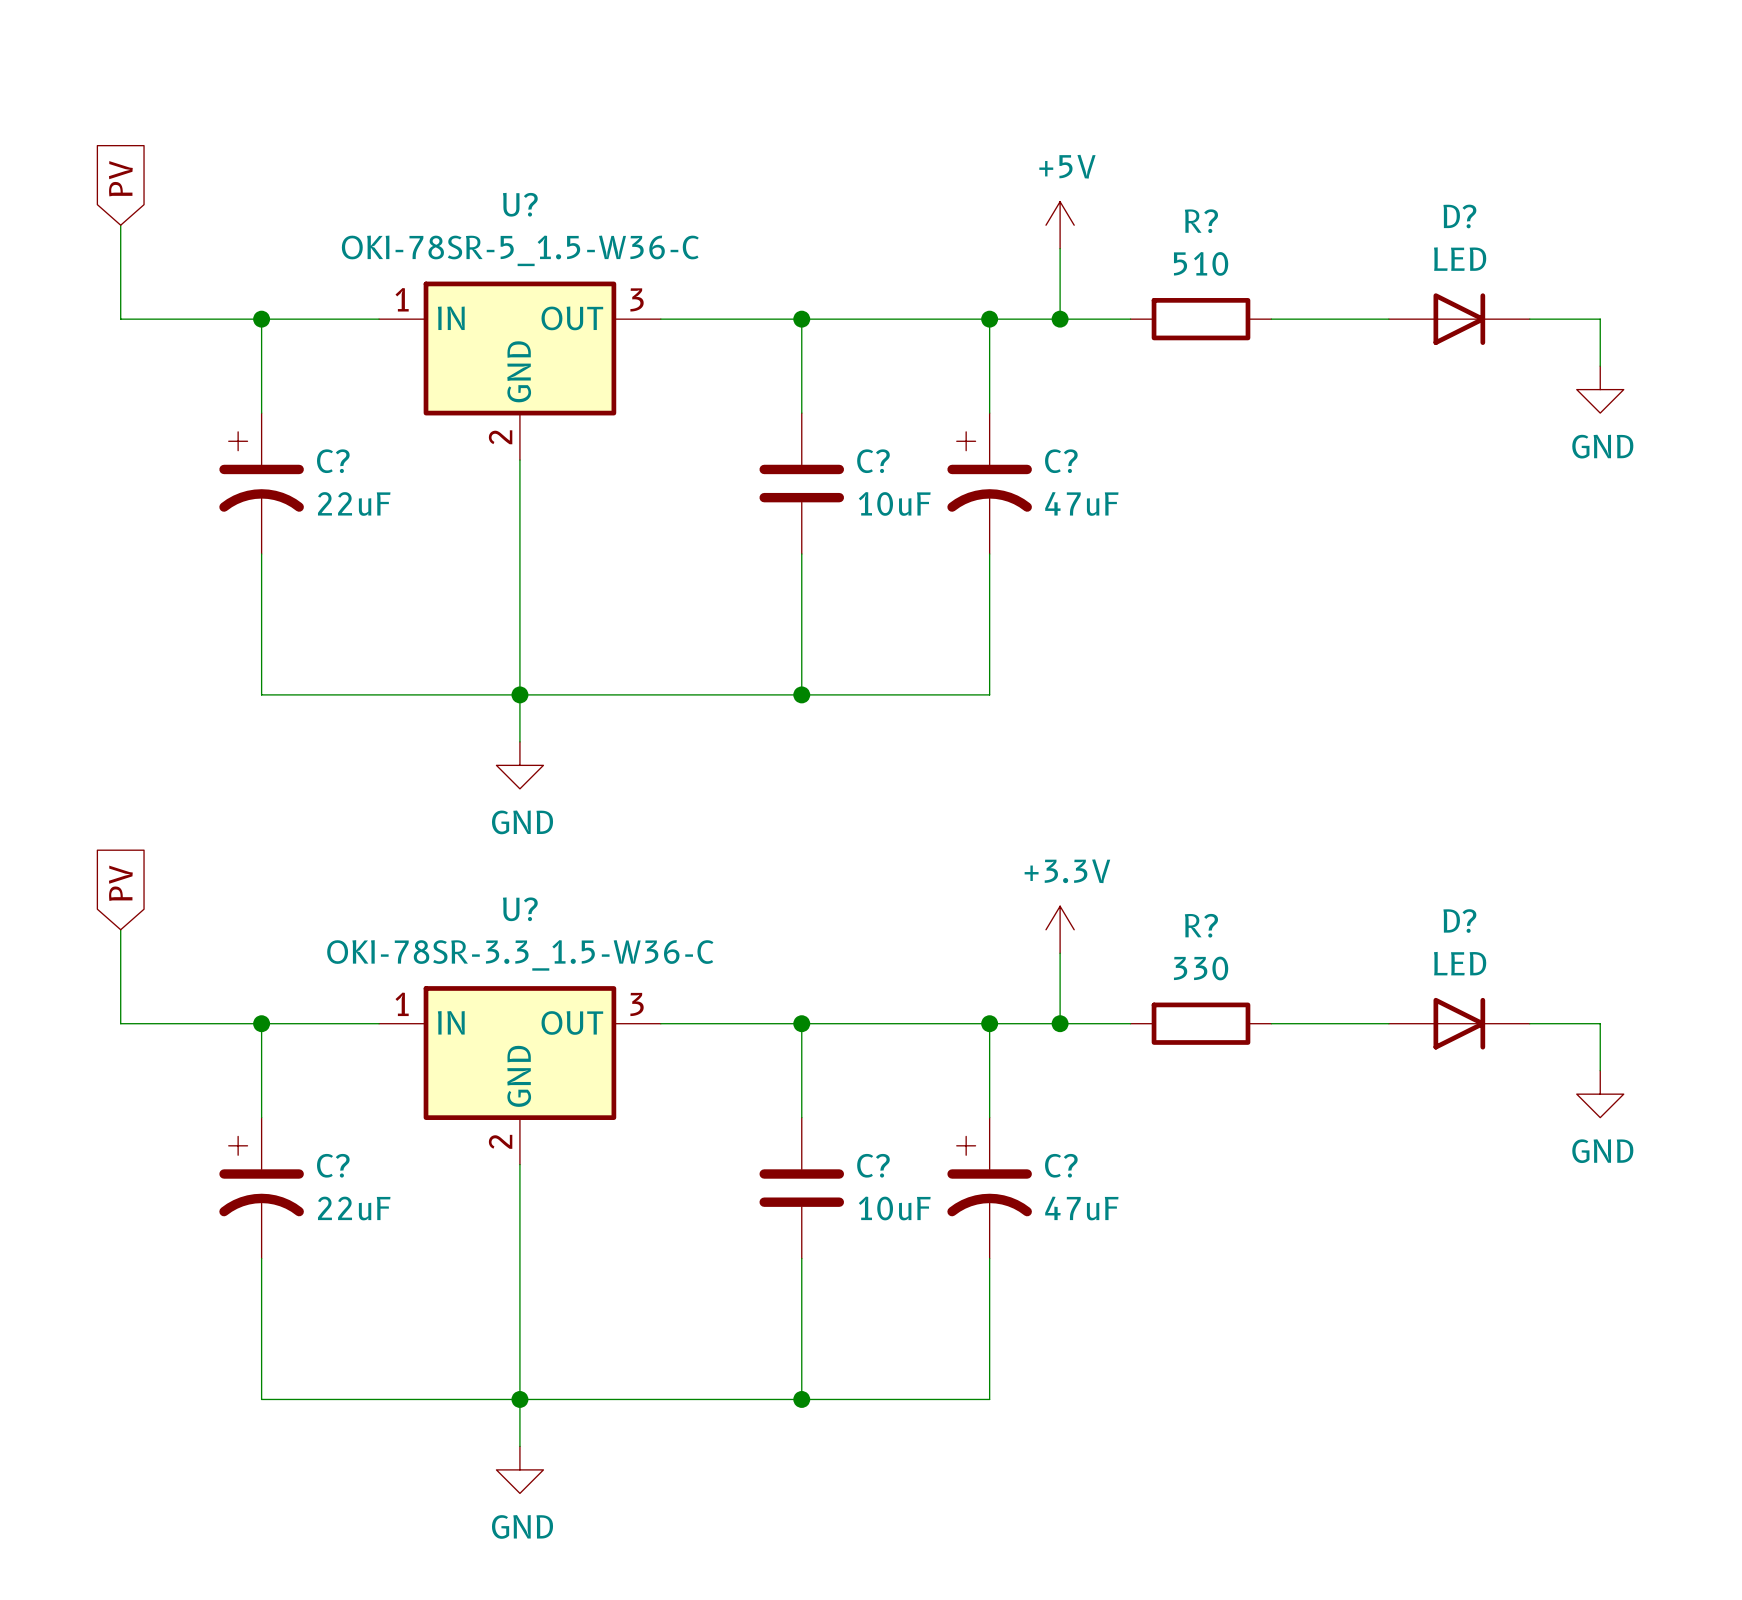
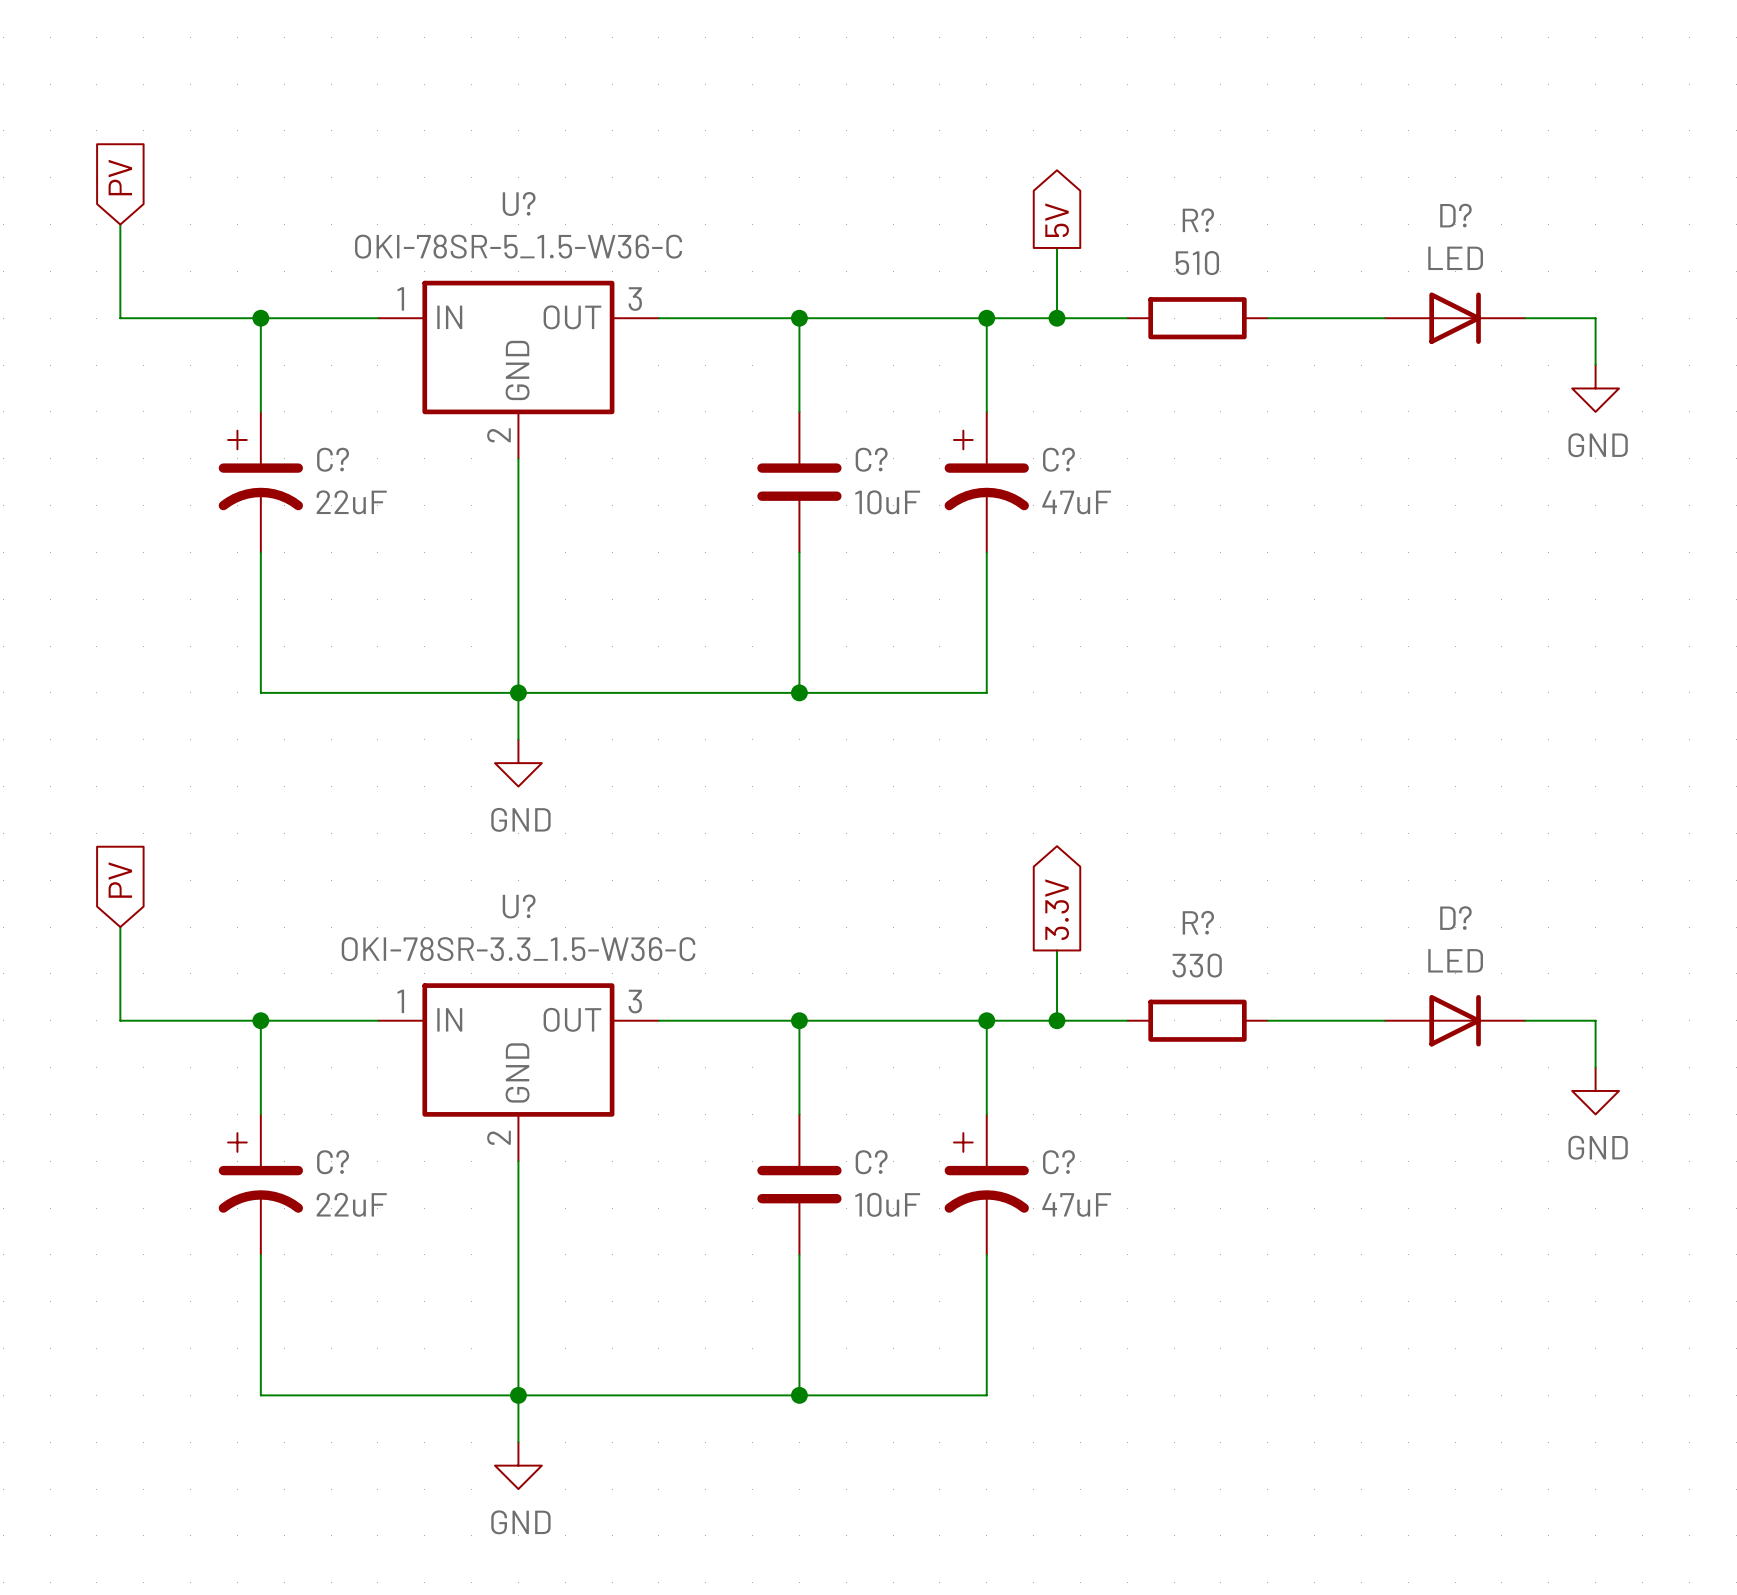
global label: none -> 5V (1057, 220)
power symbol: +5V (1060, 225) -> none
global label: none -> 3.3V (1057, 909)
power symbol: +3.3V (1060, 929) -> none

